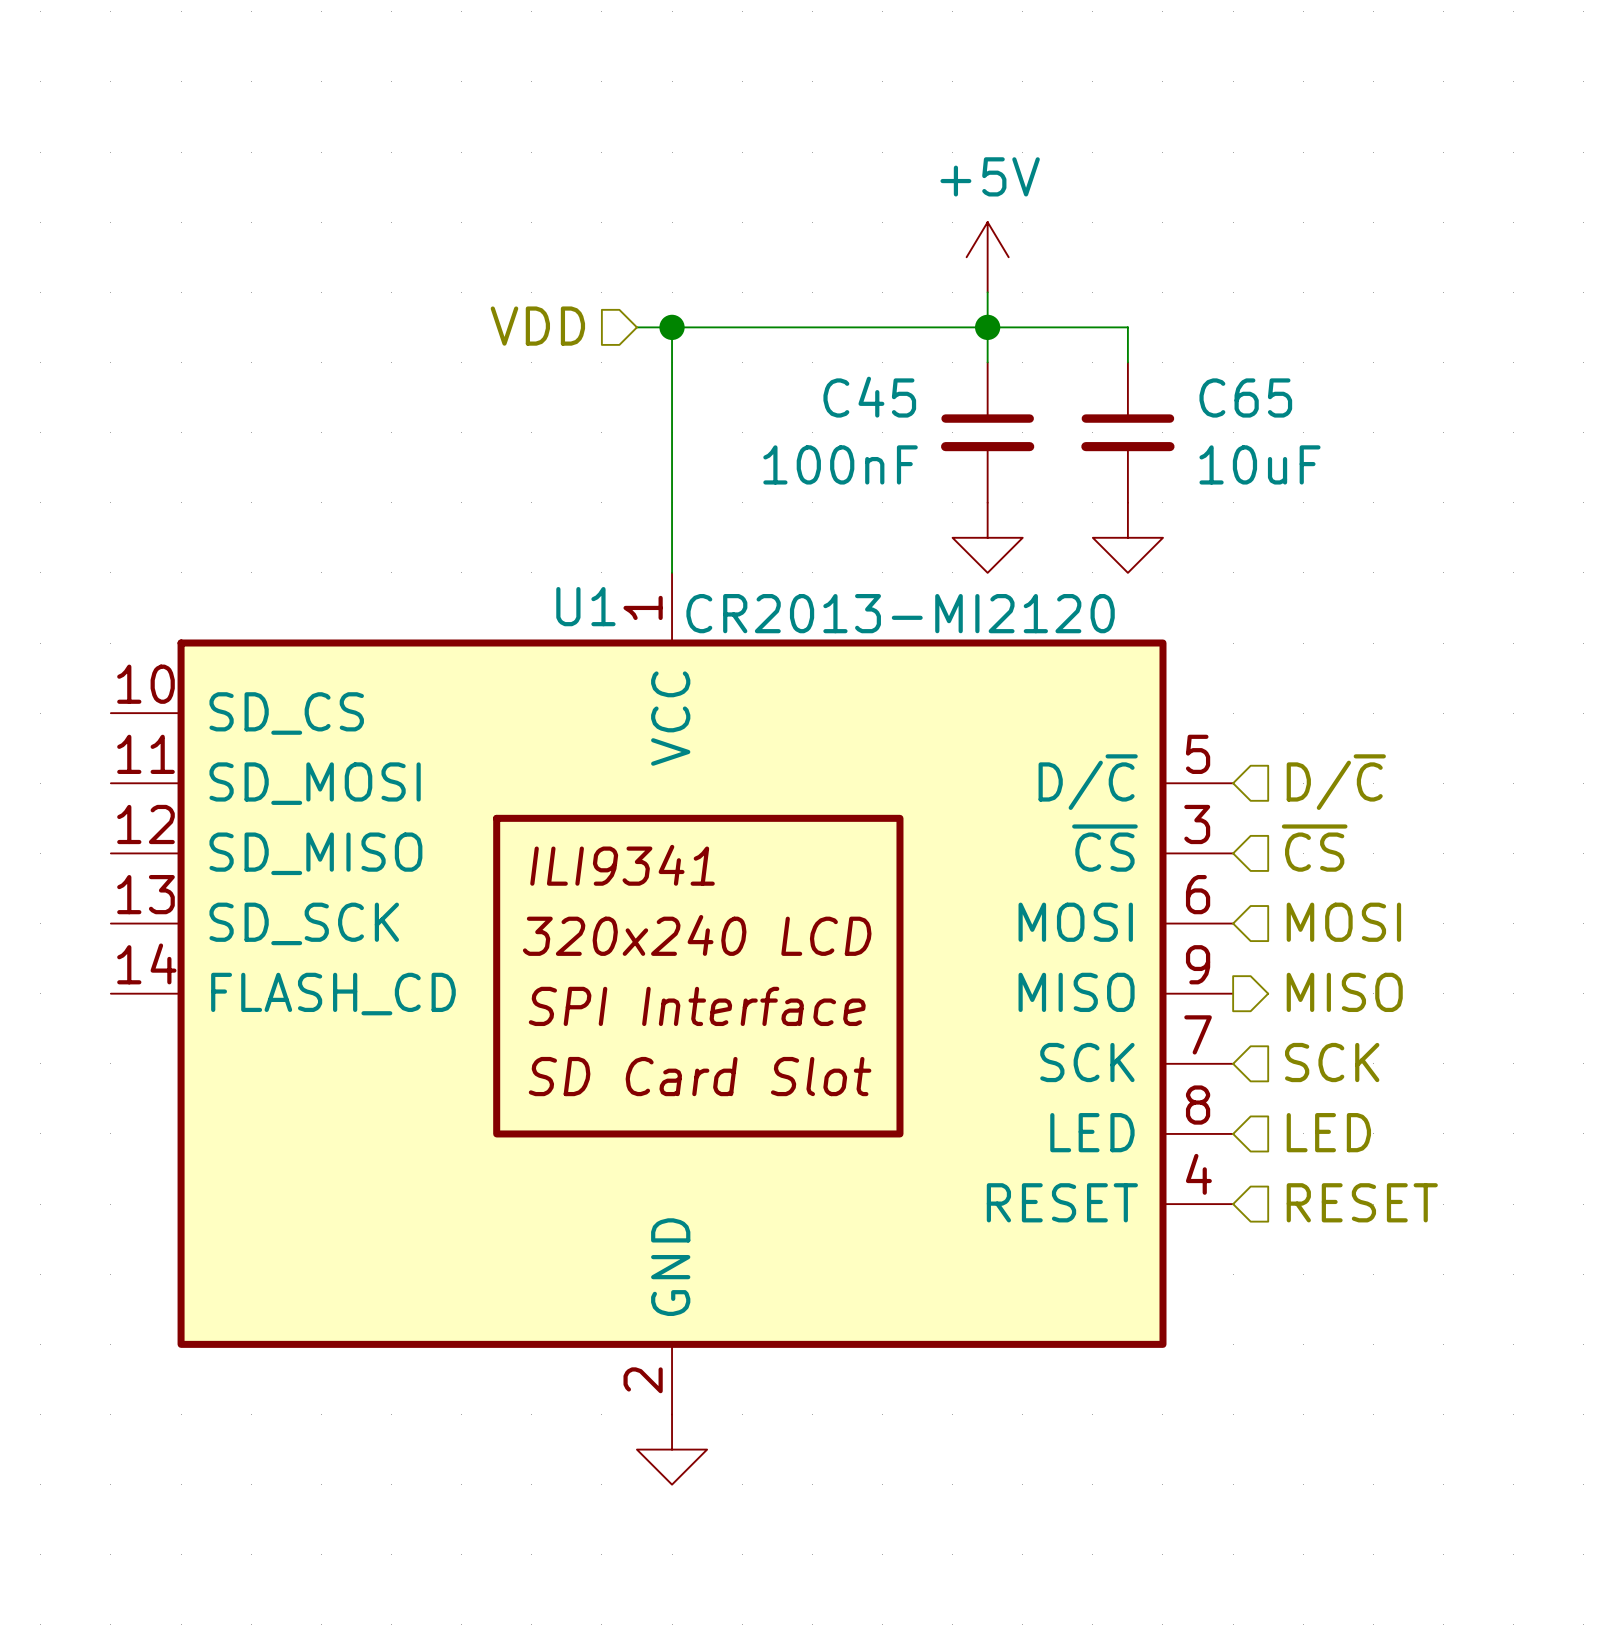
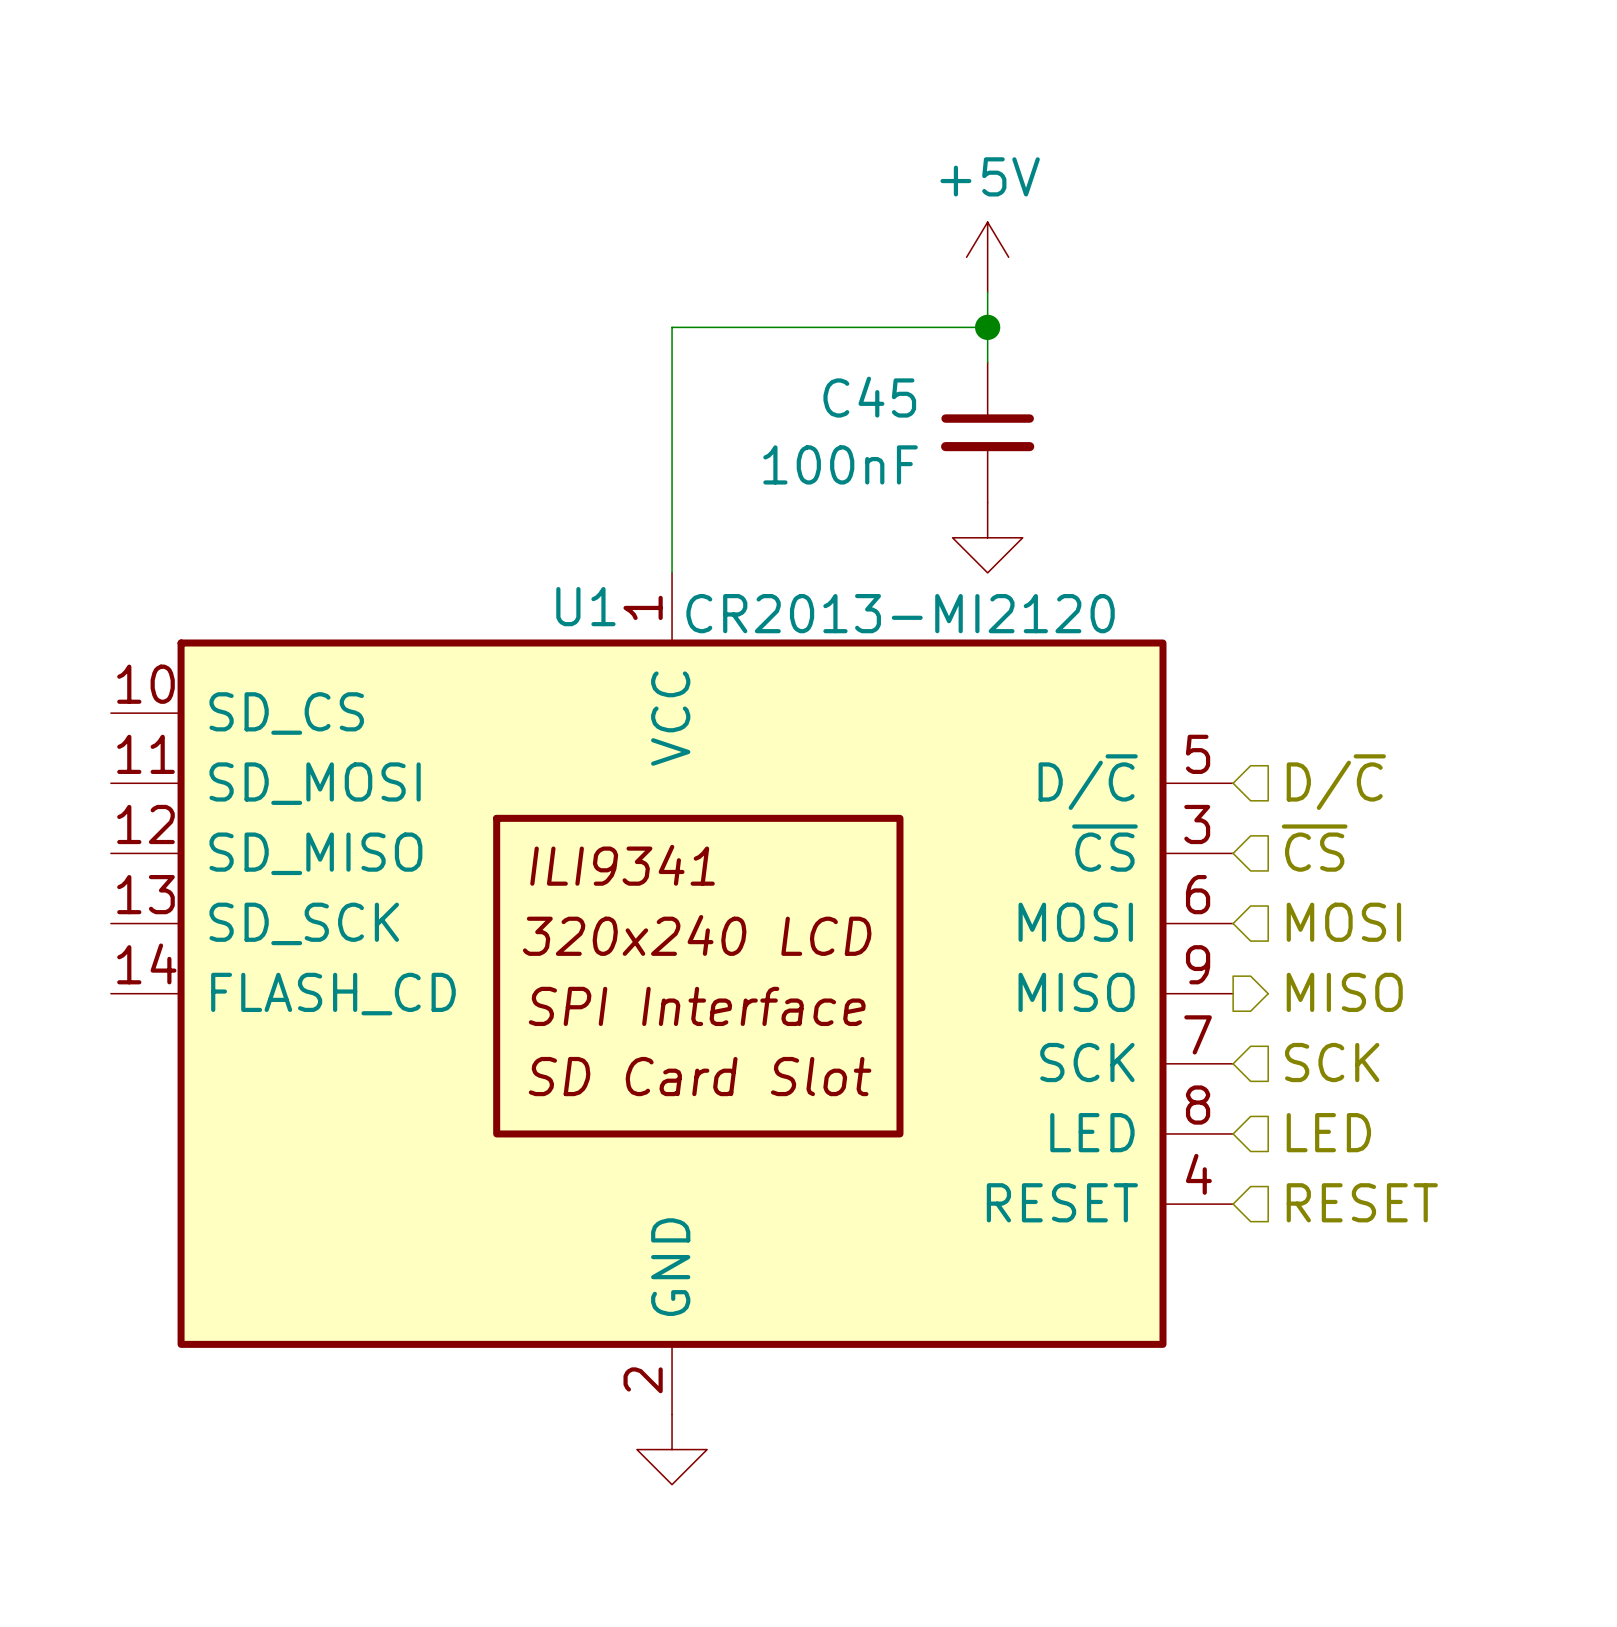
hierarchical label: VDD (537, 326) -> none
wire: (636, 327) (672, 327) -> none
junction: (672, 327) -> none
wire: (987, 327) (1127, 327) (1127, 362) -> none
C65: 10uF (1127, 432) -> none
power symbol: (1127, 537) -> none

